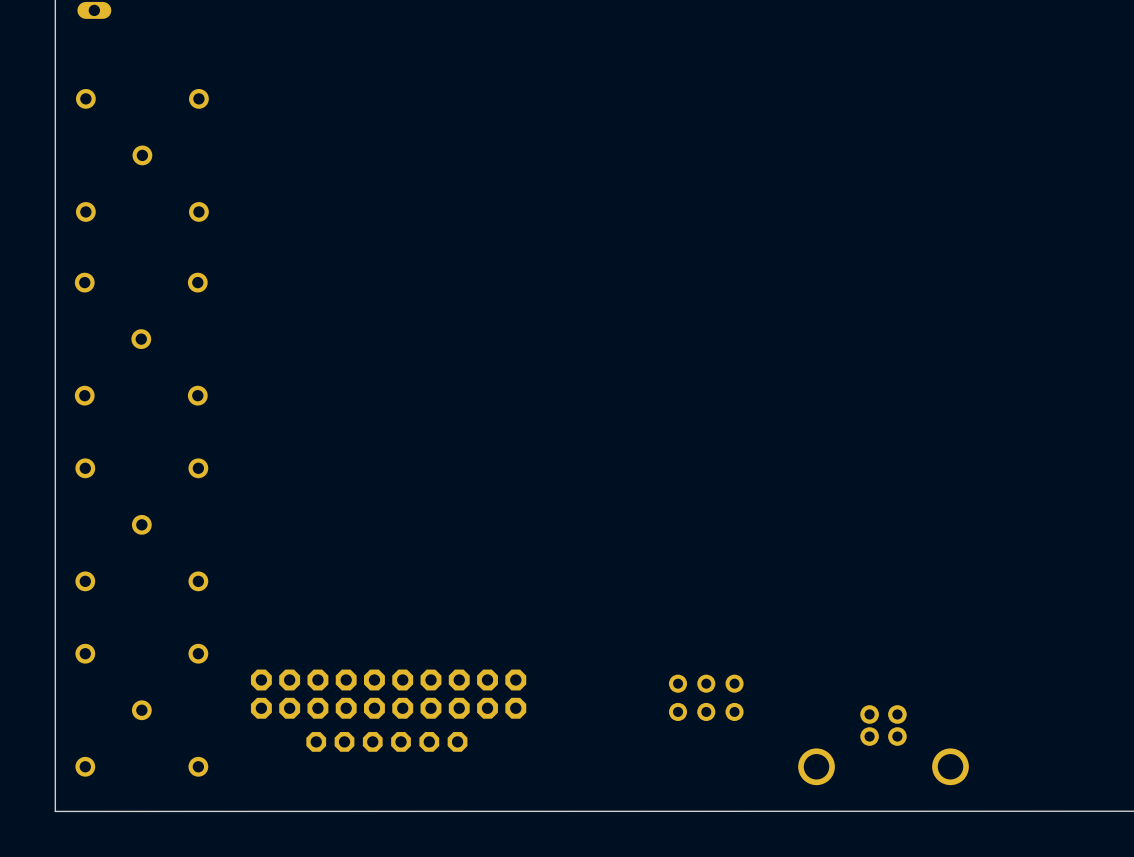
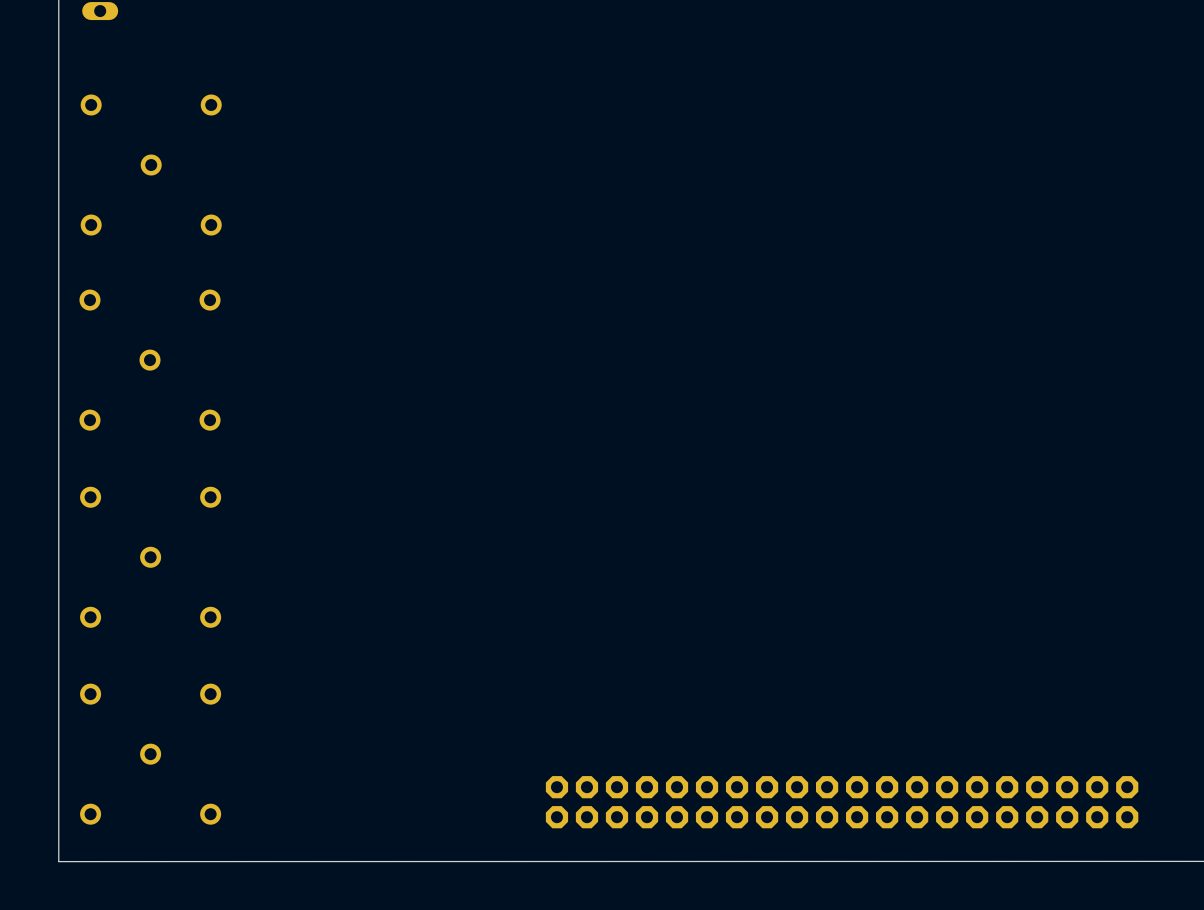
part: (388, 694) -> none
part: (706, 697) -> none
part: (386, 741) -> none
part: (883, 745) -> none
part: none -> (842, 802)

